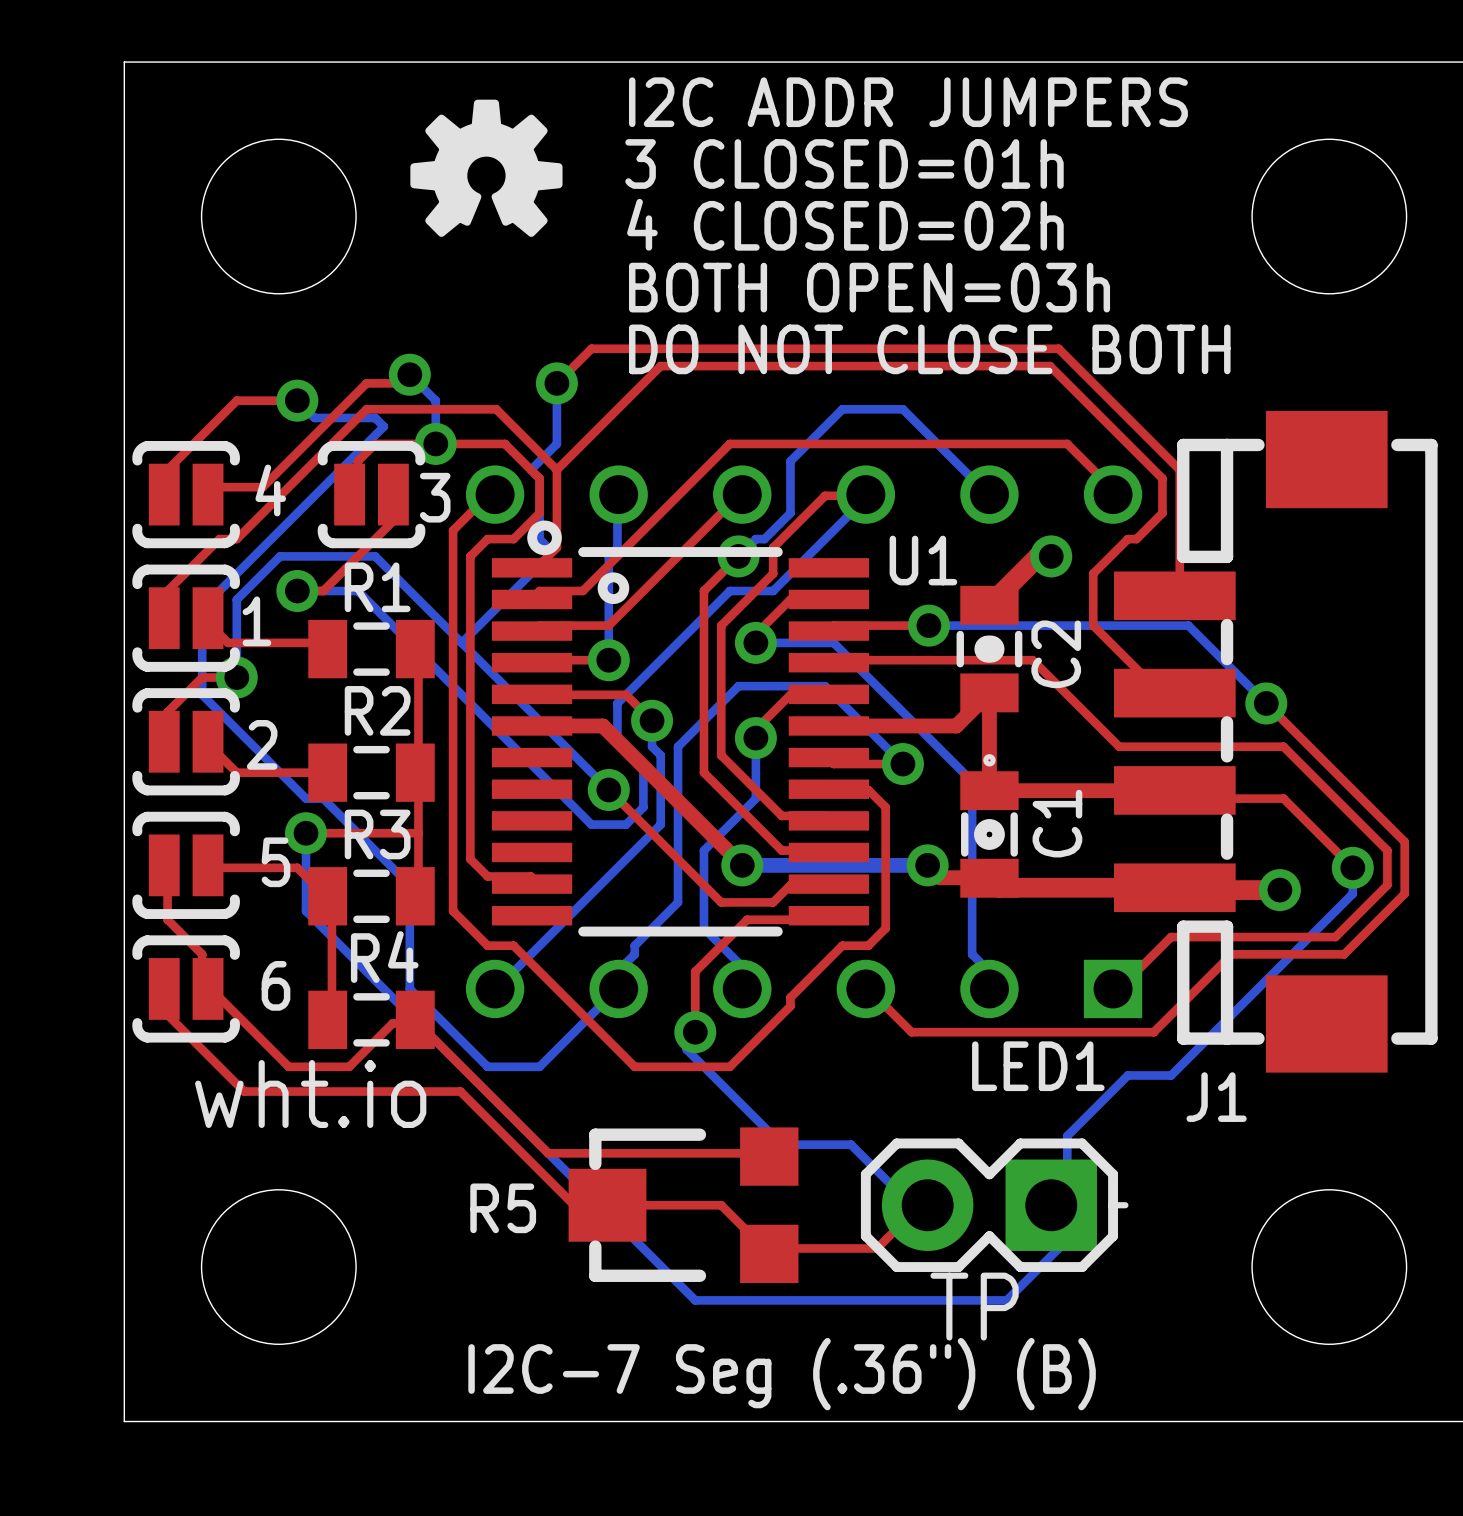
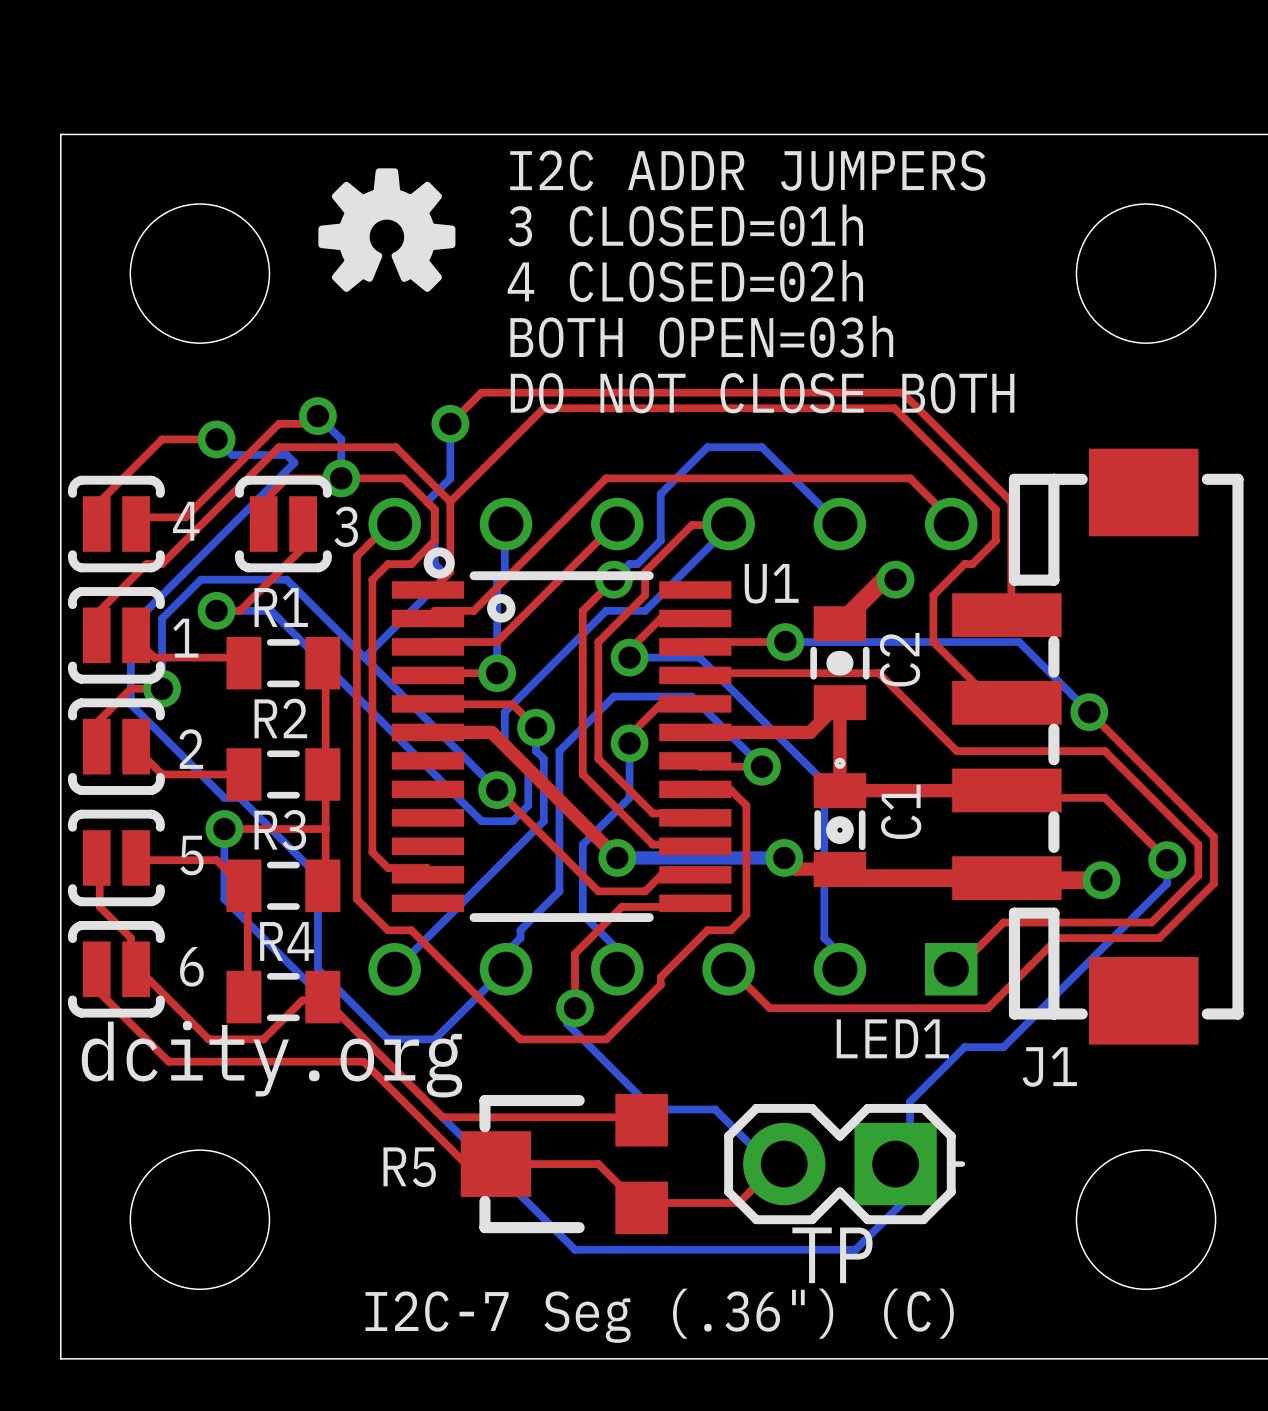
text: wht.io (310, 1094) -> dcity.org (271, 1059)
text: I2C-7 Seg (.36") (B) (782, 1374) -> I2C-7 Seg (.36") (C) (659, 1315)

